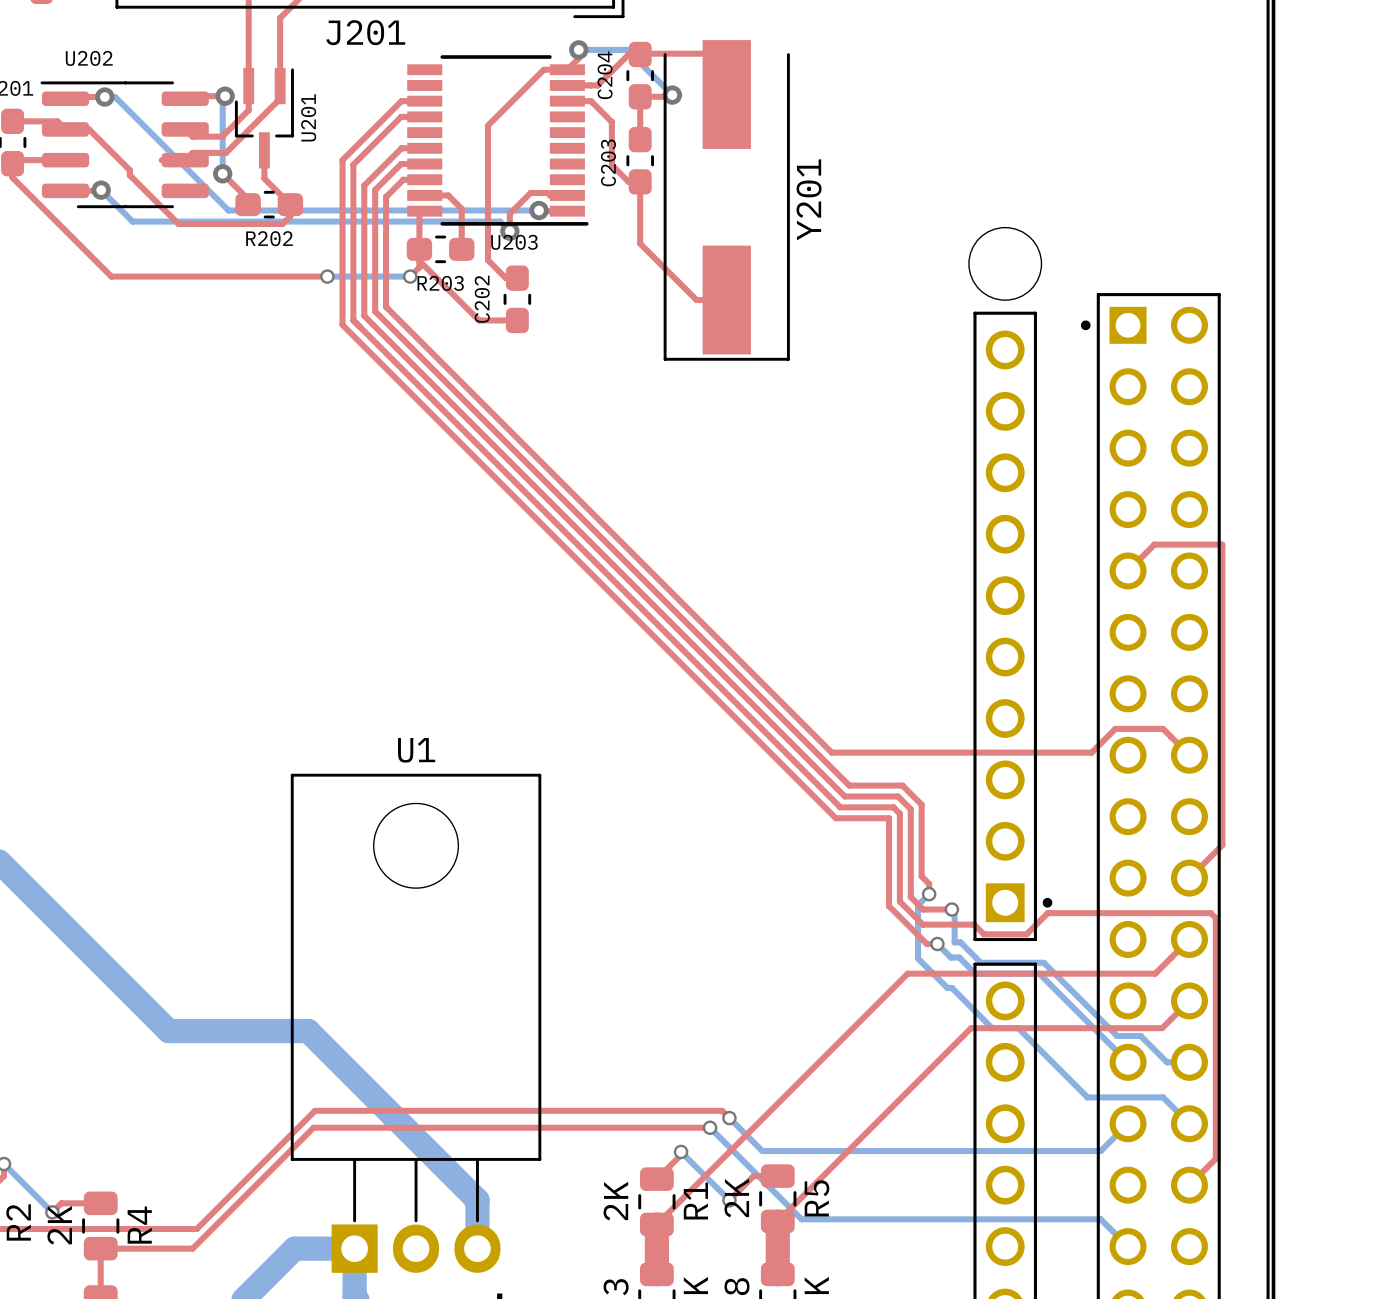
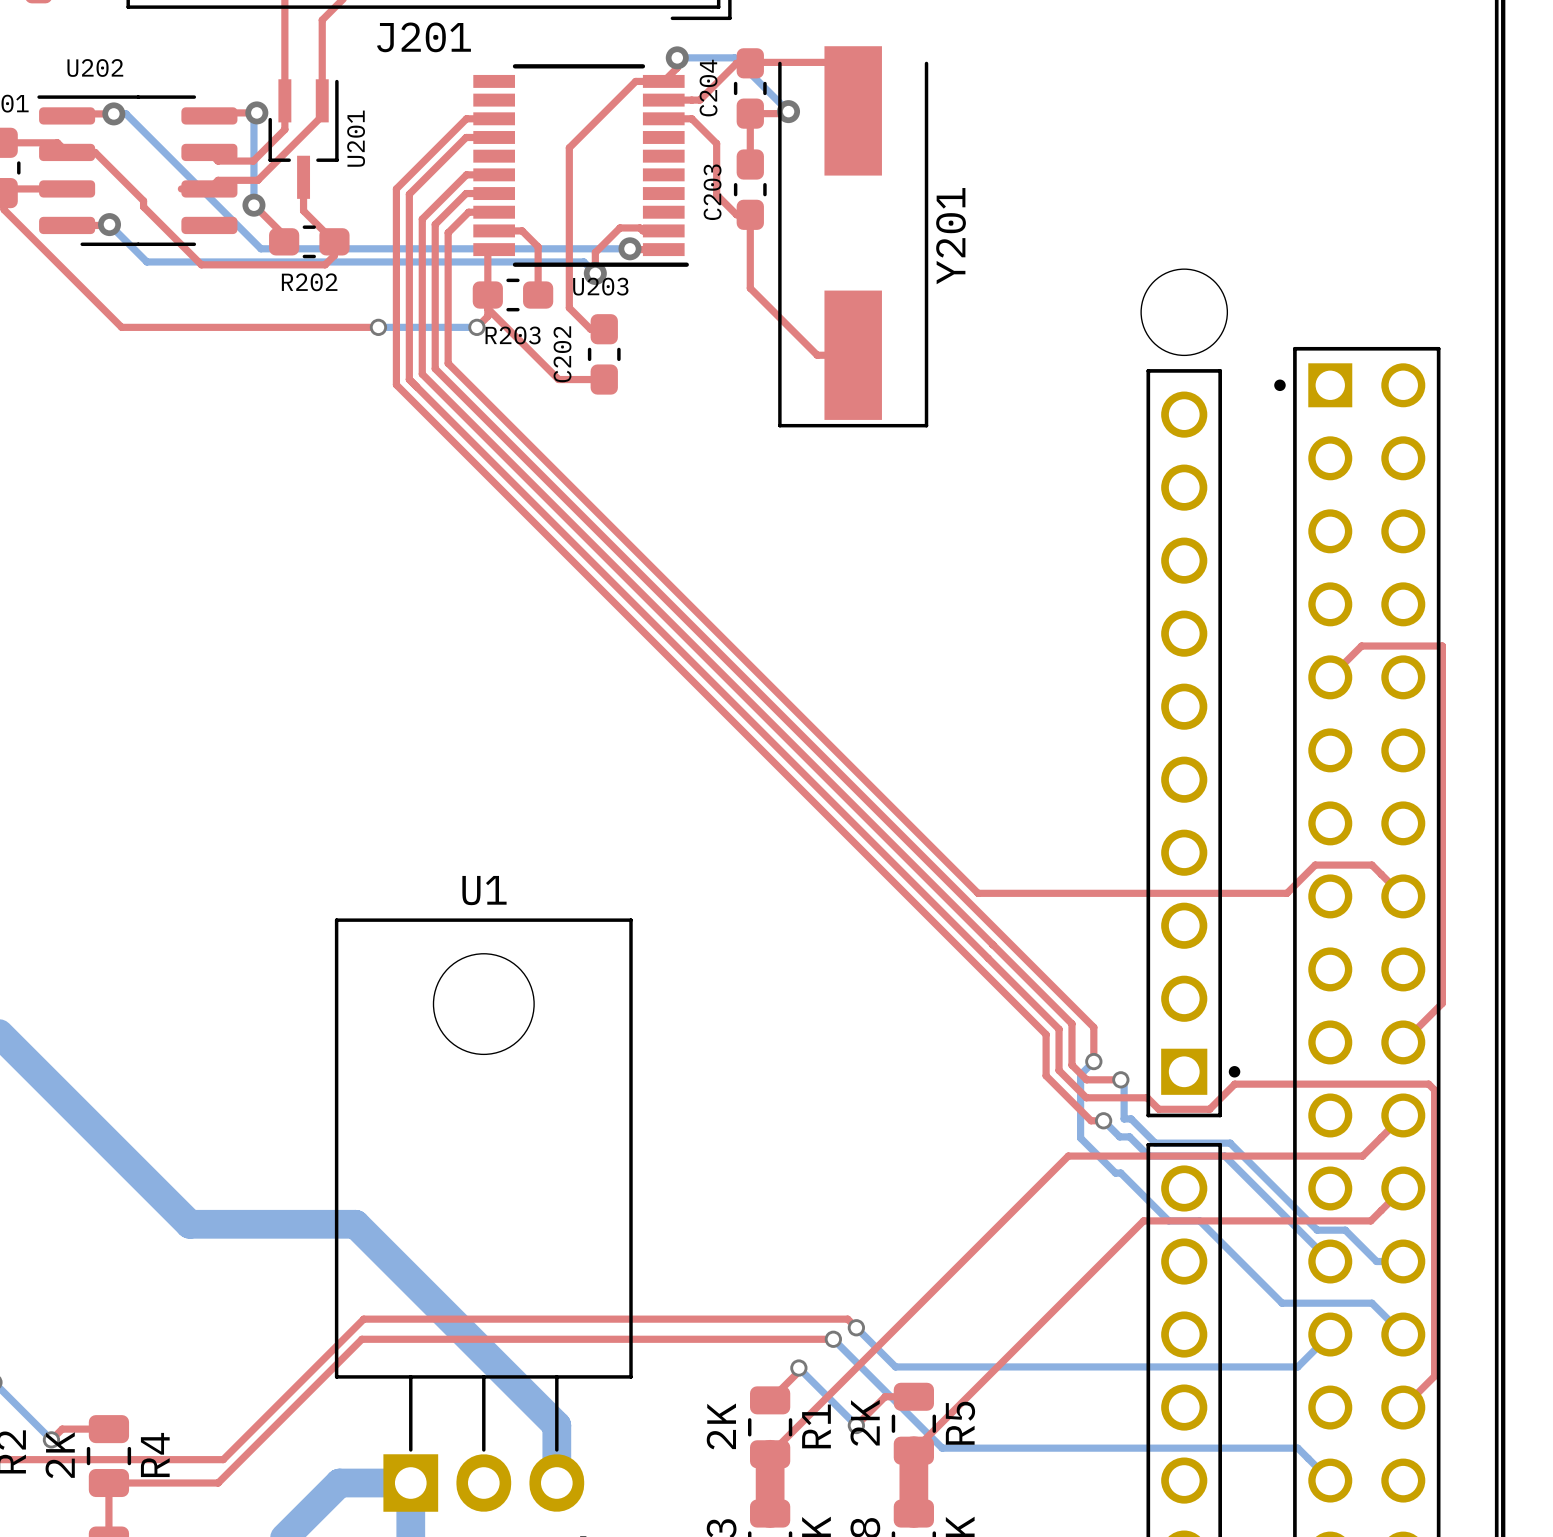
top track: (849, 785) (902, 785) (921, 804) (921, 876) (929, 883) -> (998, 932) (1093, 1027) (1093, 1049)
top track: (844, 796) (898, 796) (910, 809) (910, 862) -> (993, 945) (1071, 1023)
top track: (840, 807) (893, 807) (899, 813) (899, 866) -> (988, 958) (1059, 1029)
top track: (835, 818) (889, 818) (889, 871) -> (982, 971) (1046, 1034)

